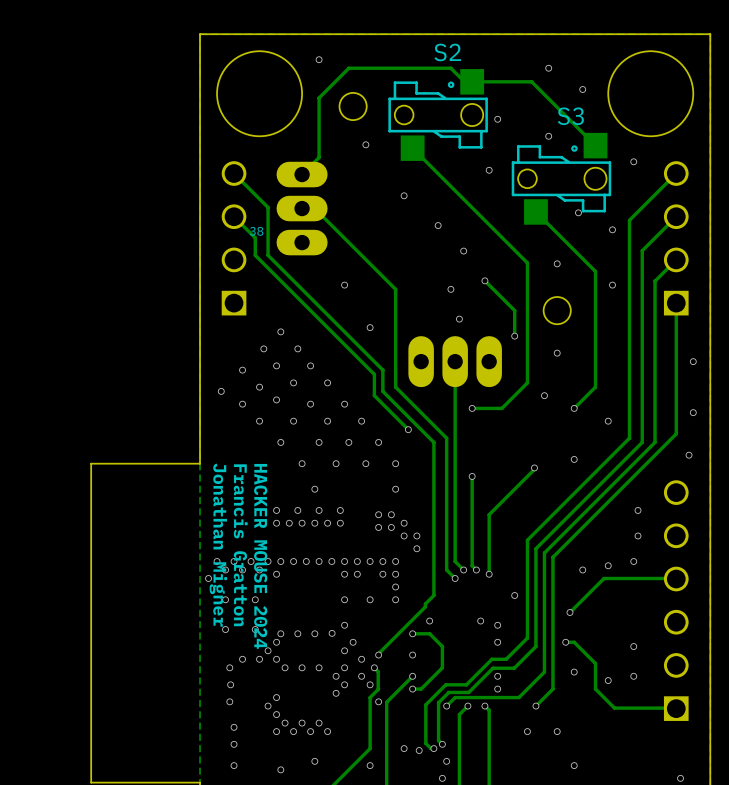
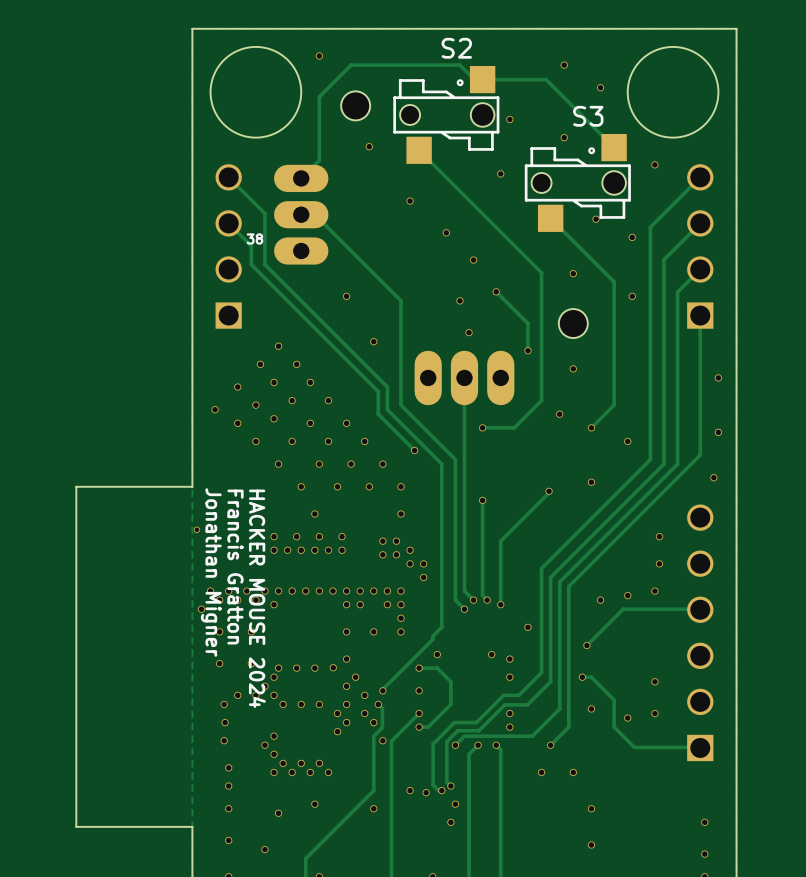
via: none -> (196, 529)

